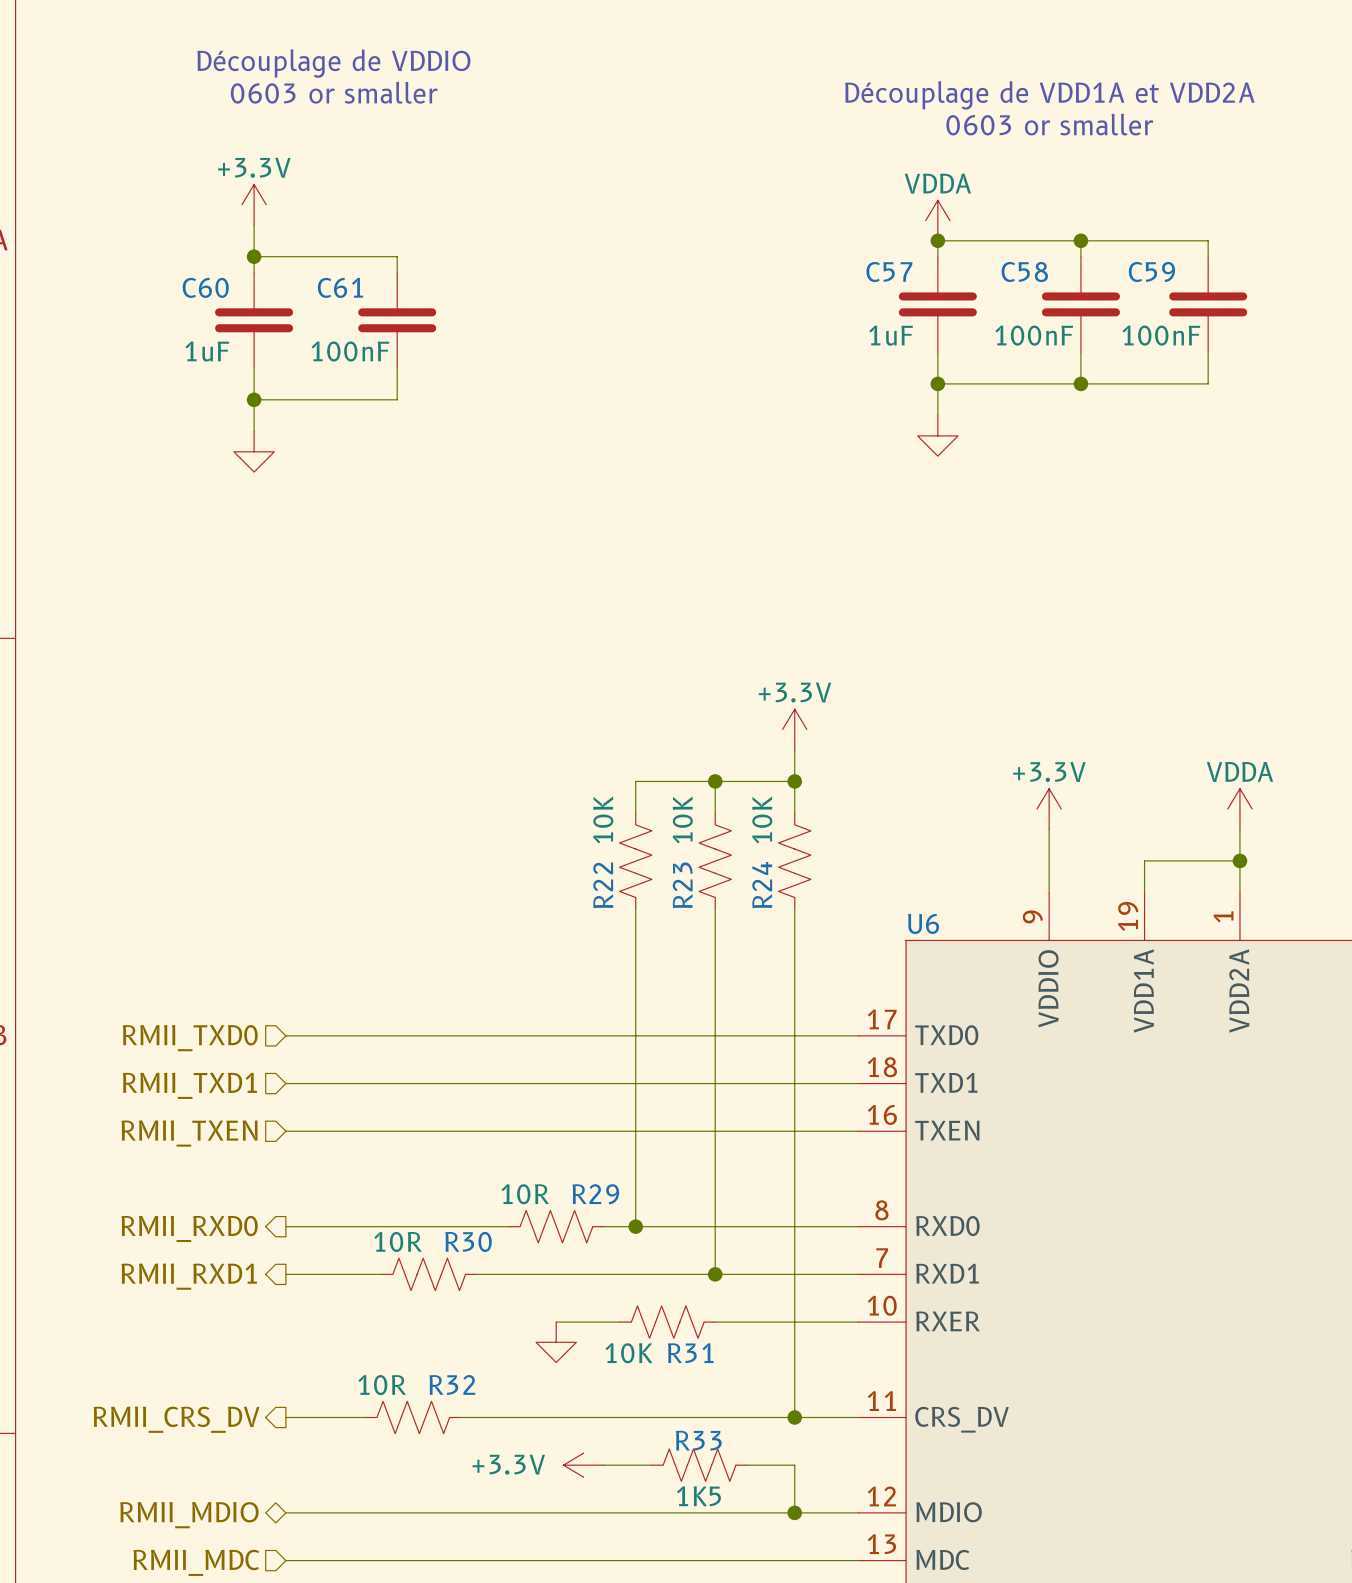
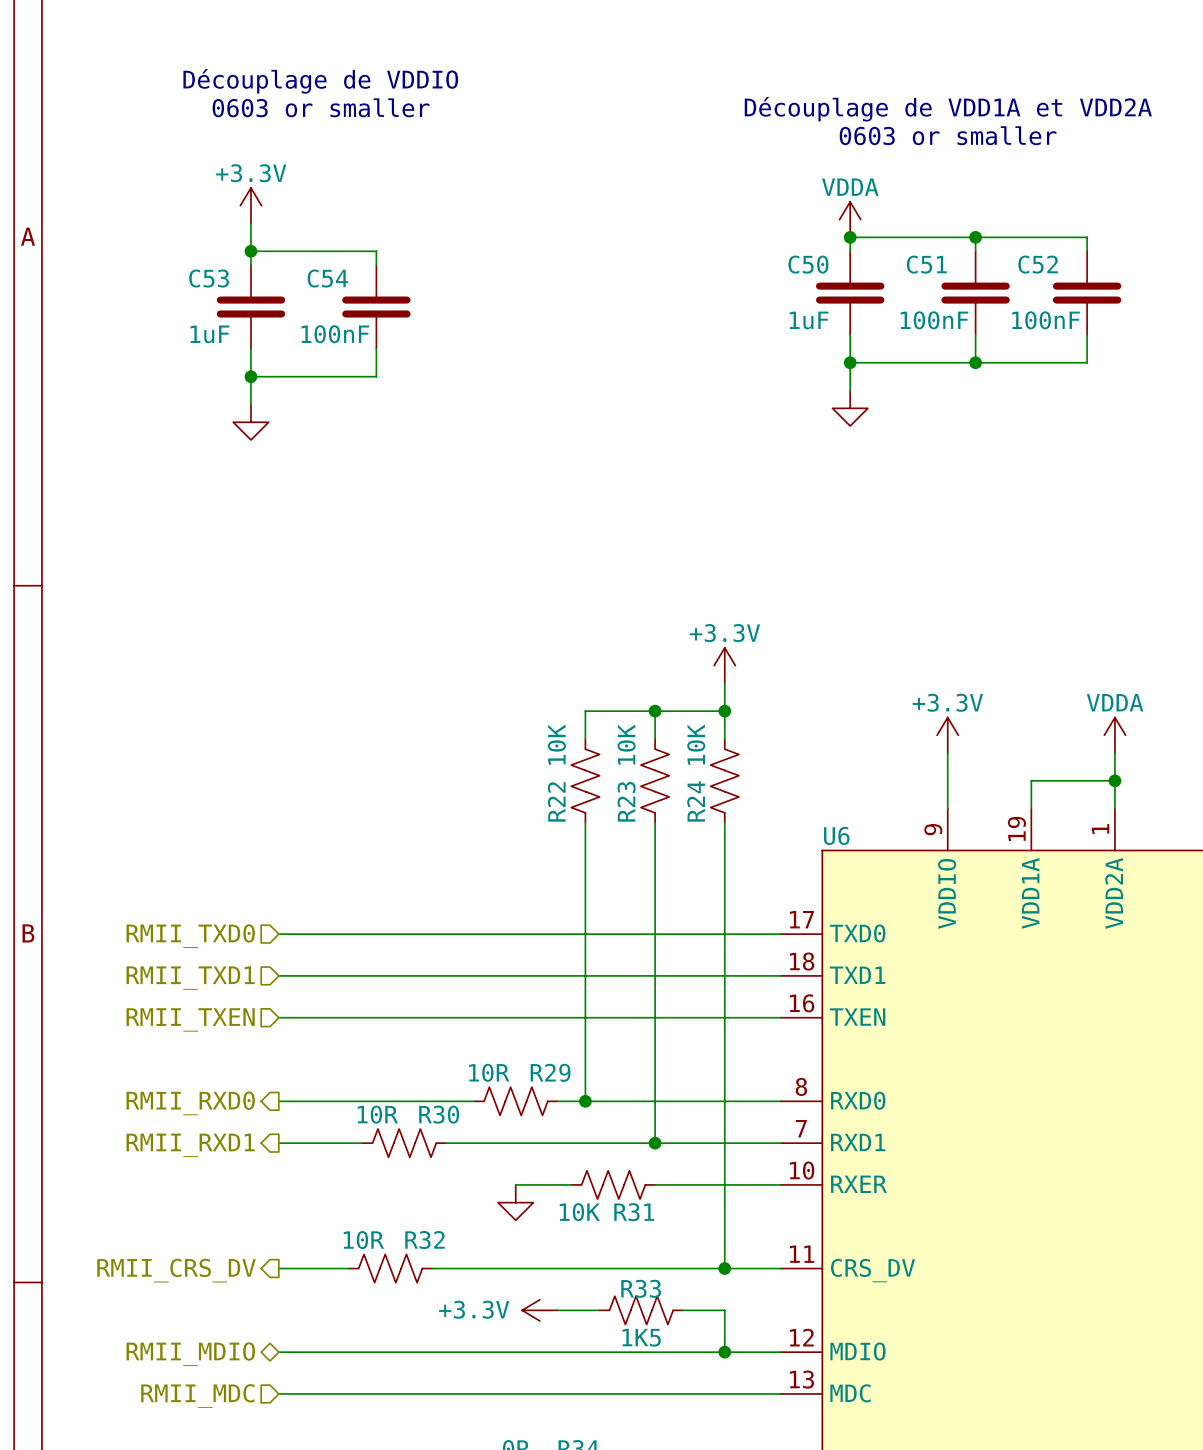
C57 name: C57 (889, 271) -> C50 (808, 264)
C58 name: C58 (1024, 271) -> C51 (926, 264)
C59 name: C59 (1151, 271) -> C52 (1038, 264)
C60 name: C60 (205, 287) -> C53 (209, 278)
C61 name: C61 (340, 287) -> C54 (327, 278)

